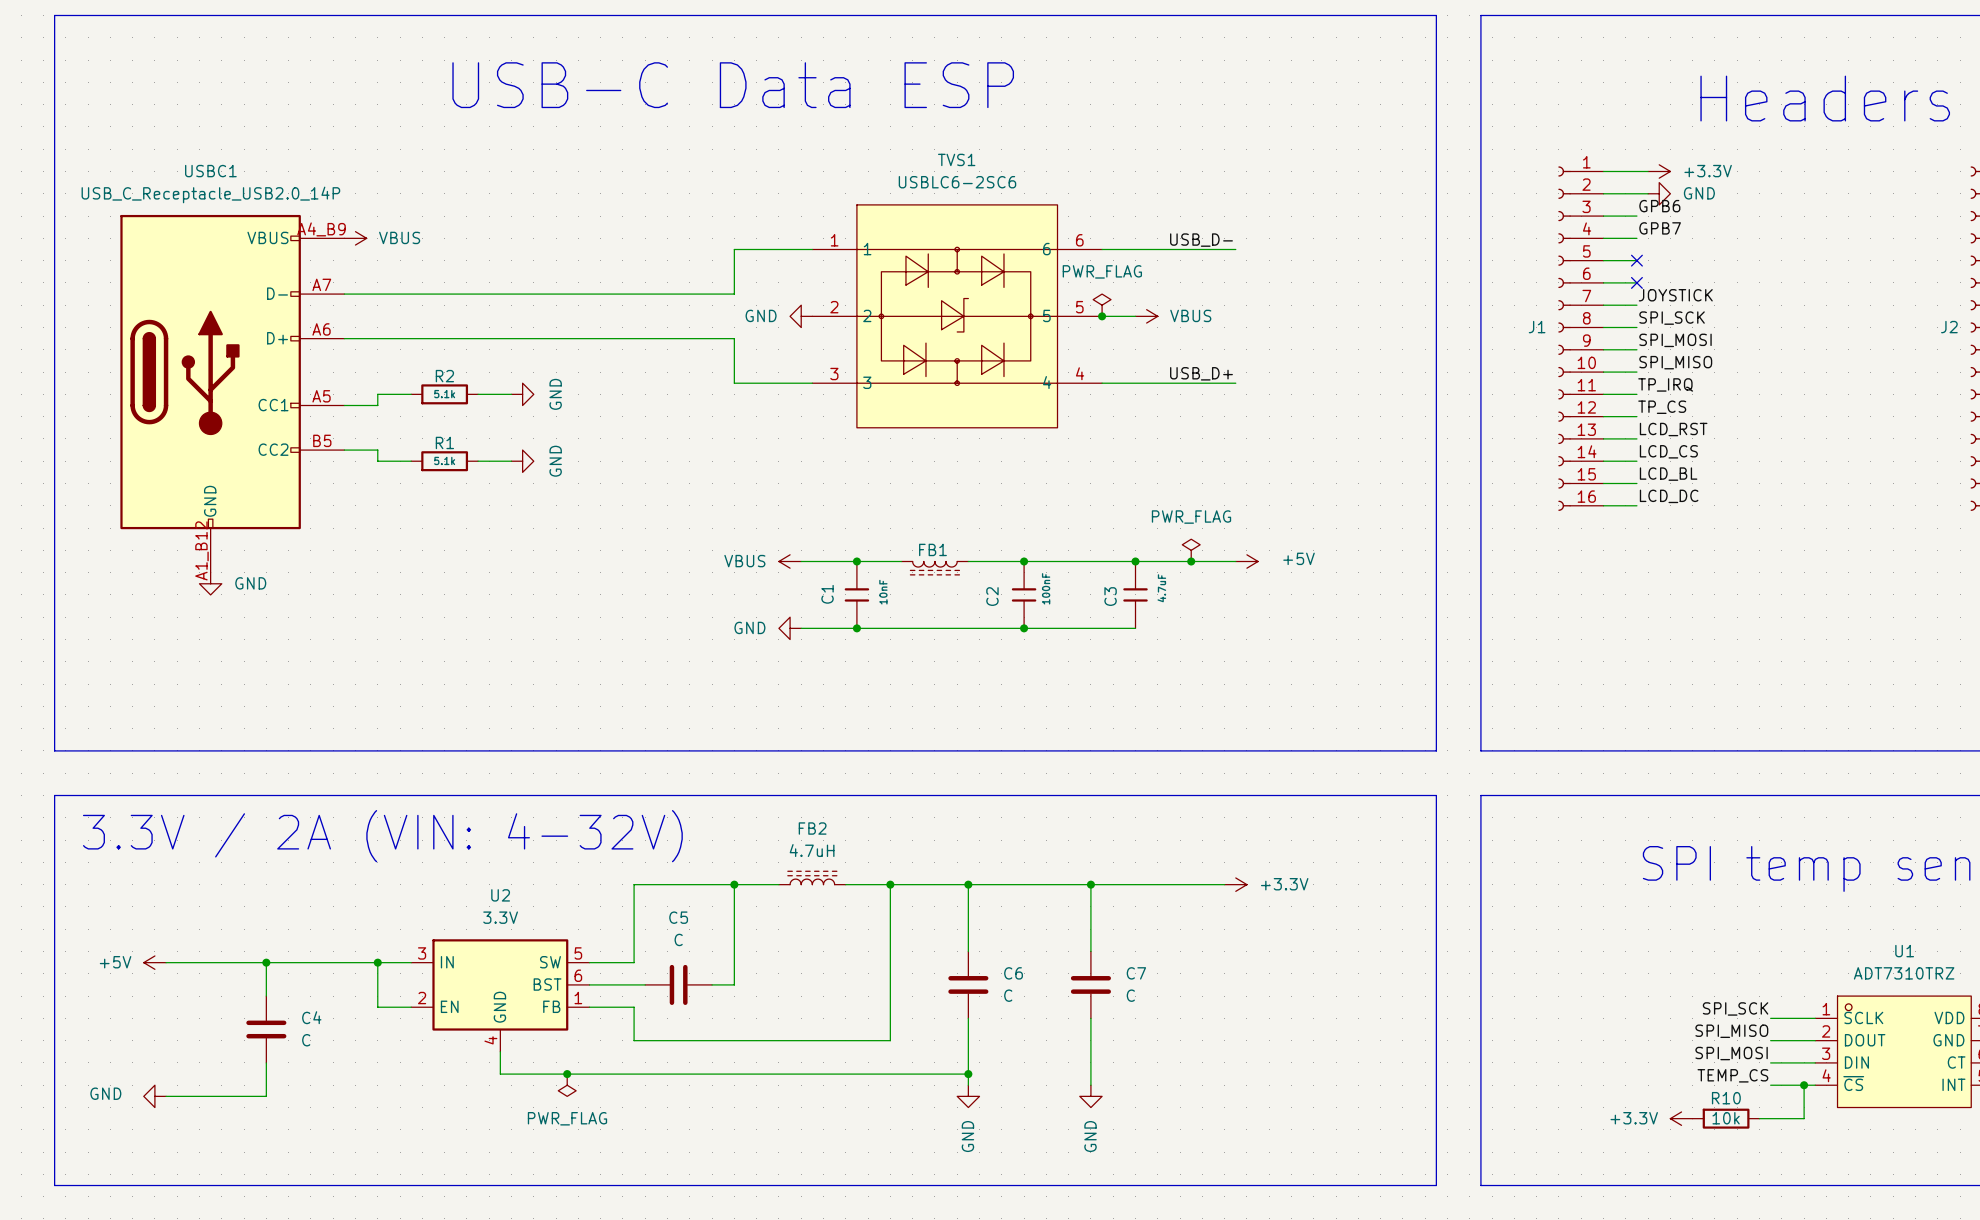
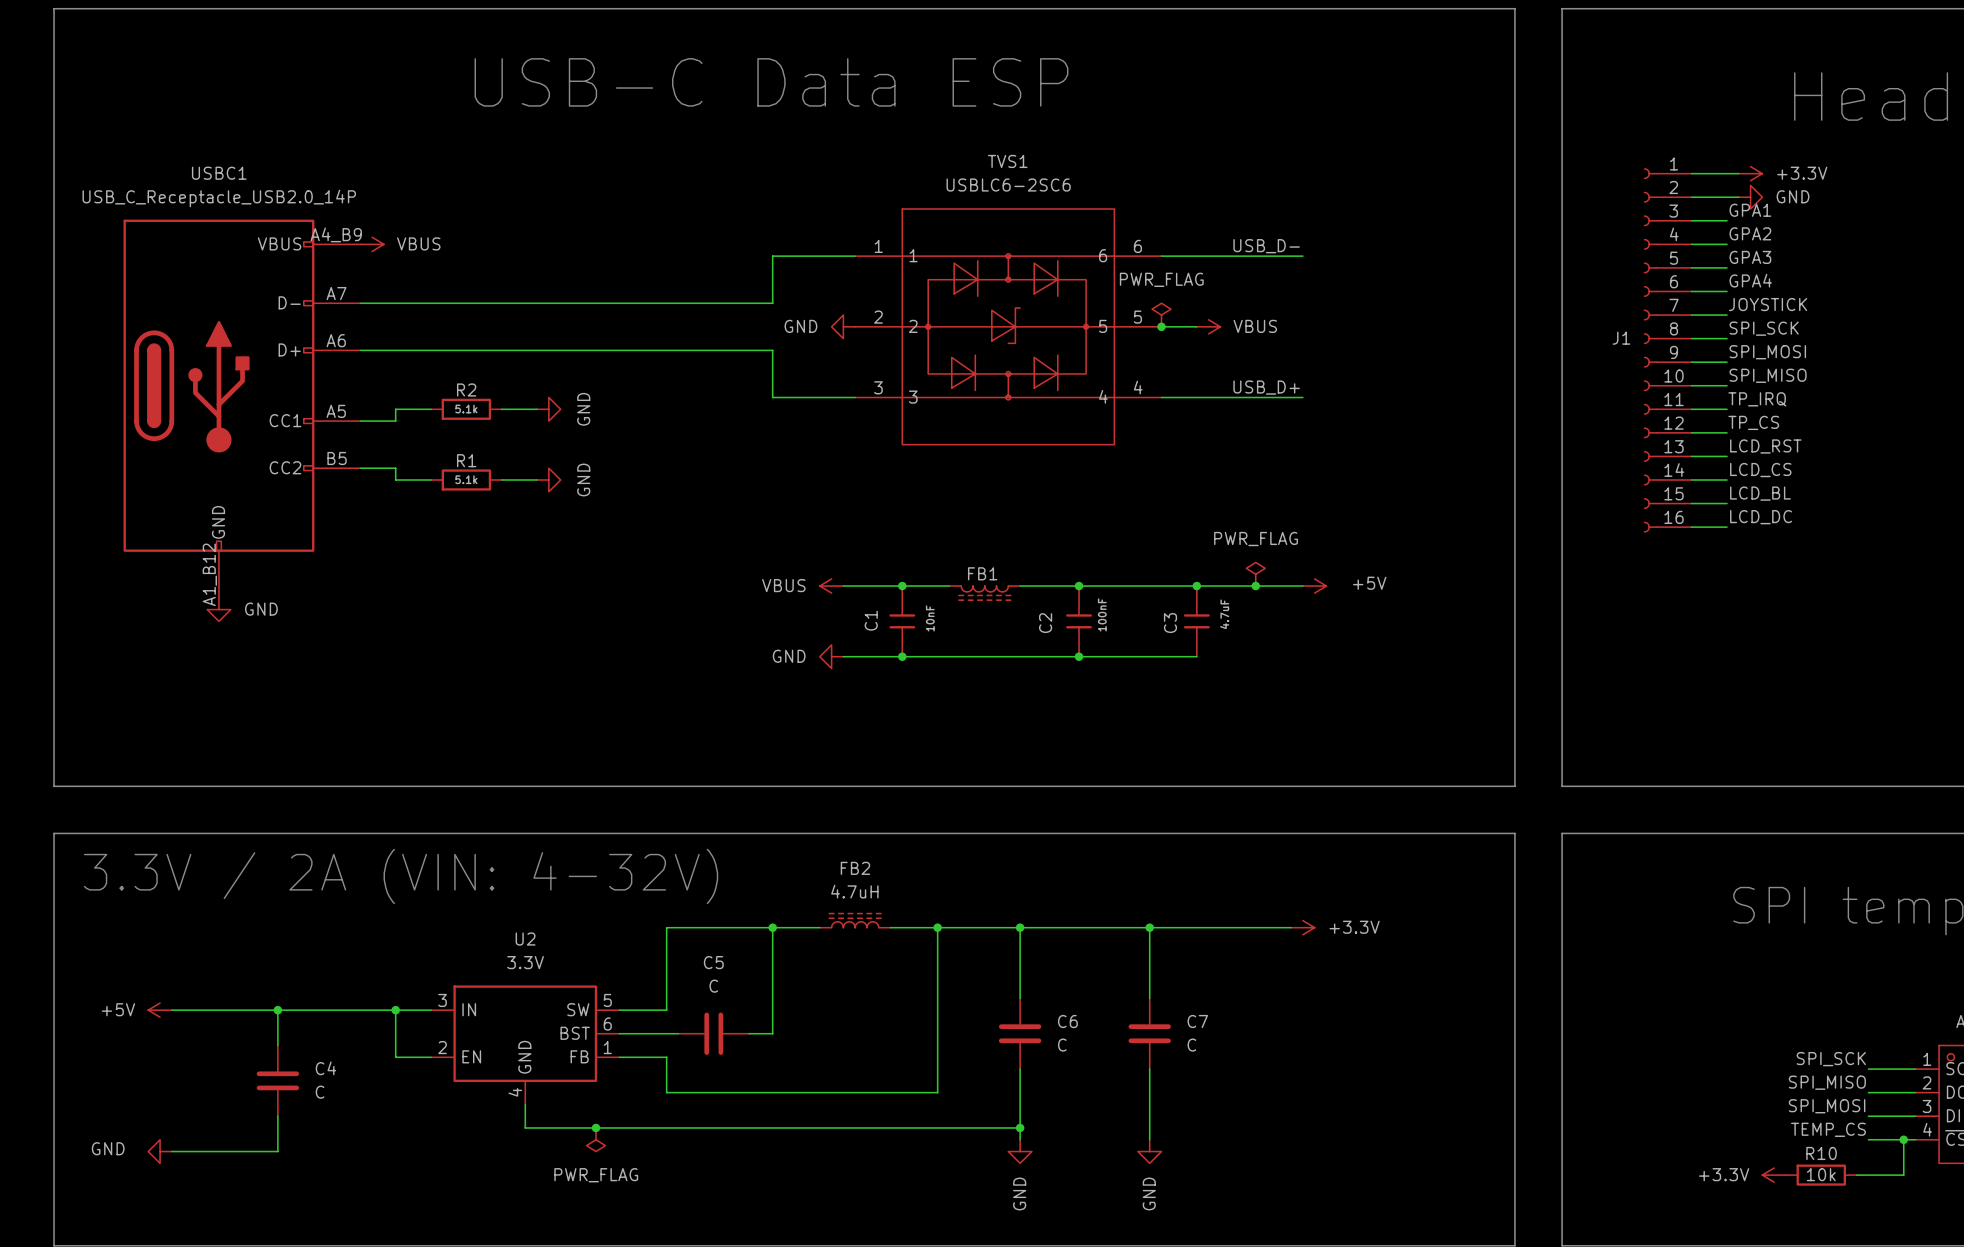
label: GPB6 (1659, 206) -> GPA1 (1750, 210)
label: GPB7 (1660, 228) -> GPA2 (1750, 233)
label: none -> GPA3 (1750, 257)
no-connect mark: (1636, 260) -> none
label: none -> GPA4 (1750, 280)
no-connect mark: (1636, 282) -> none

